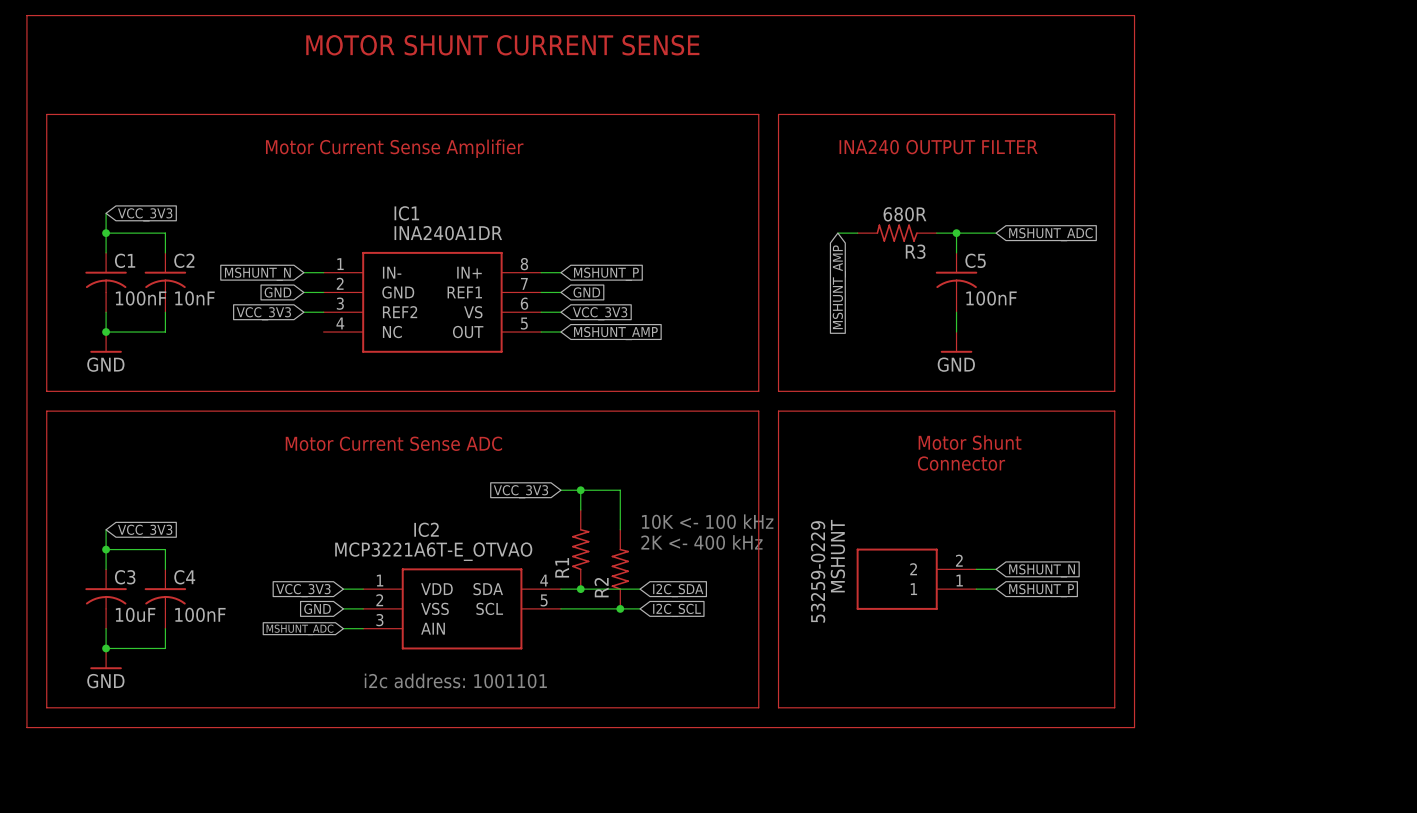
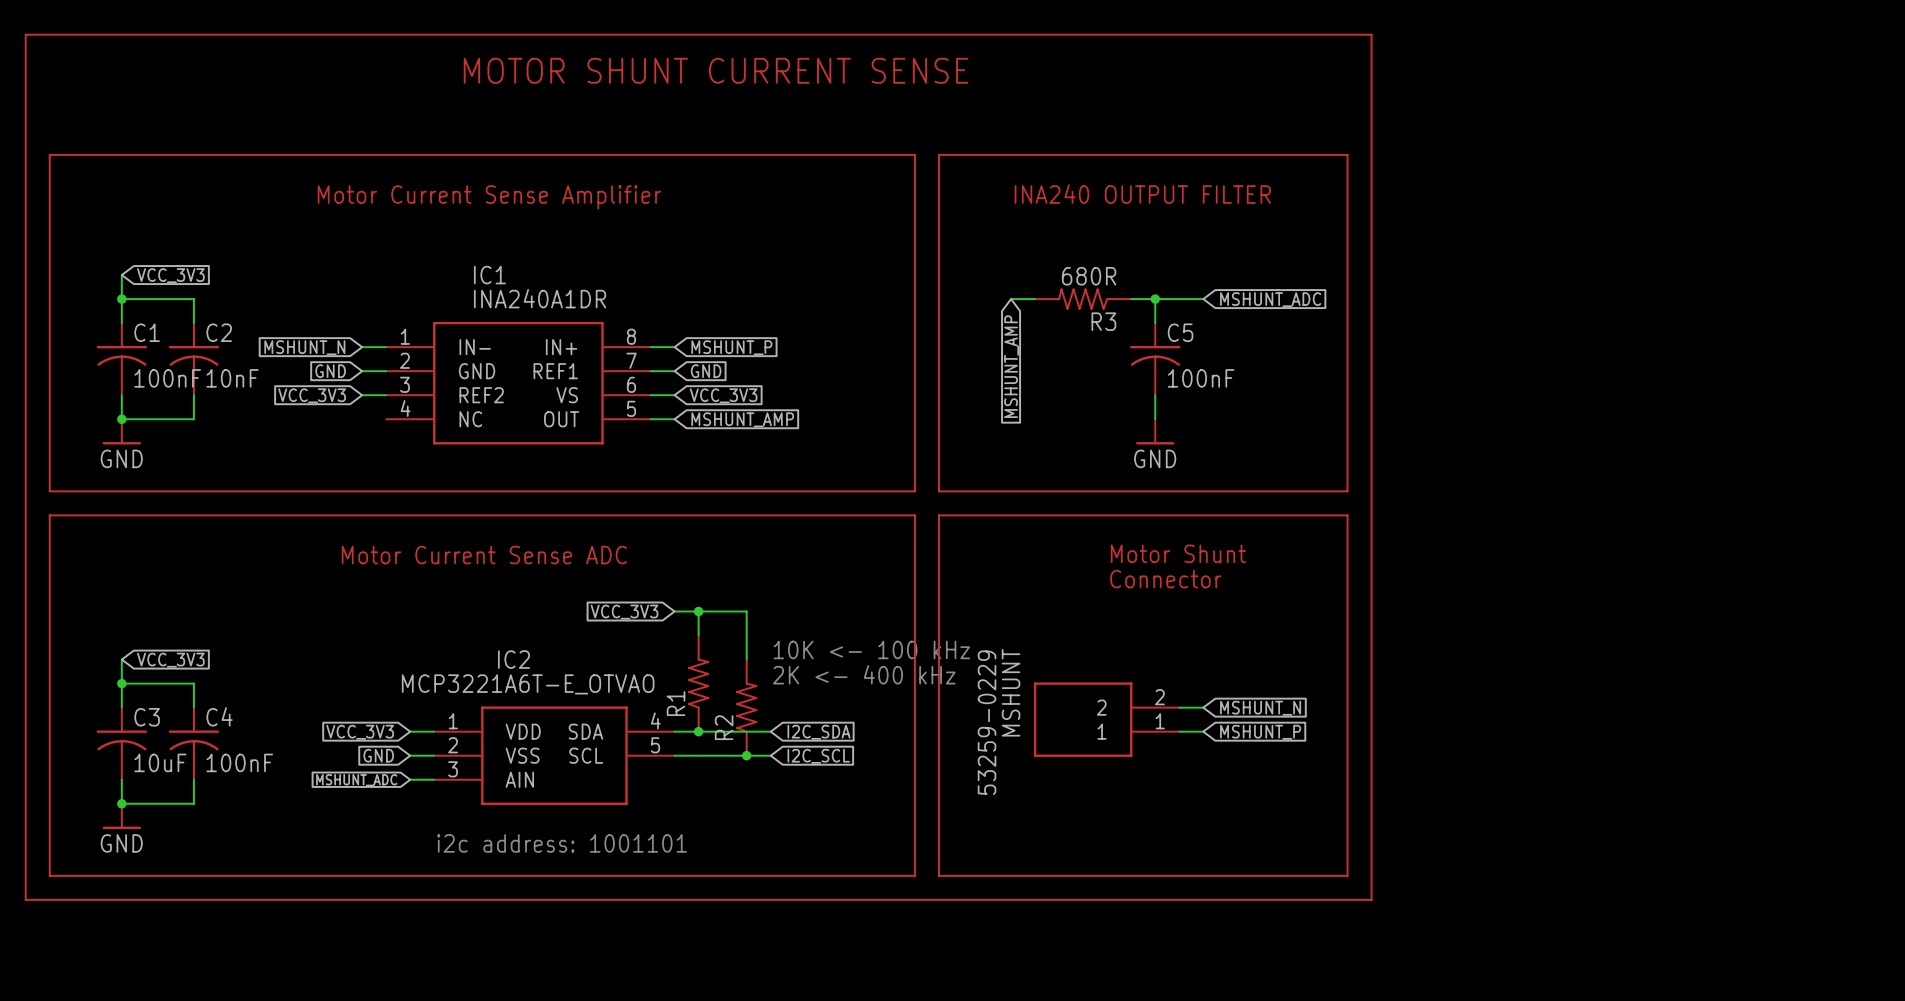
text position: MOTOR SHUNT CURRENT SENSE (502, 45) -> MOTOR SHUNT CURRENT SENSE (716, 70)

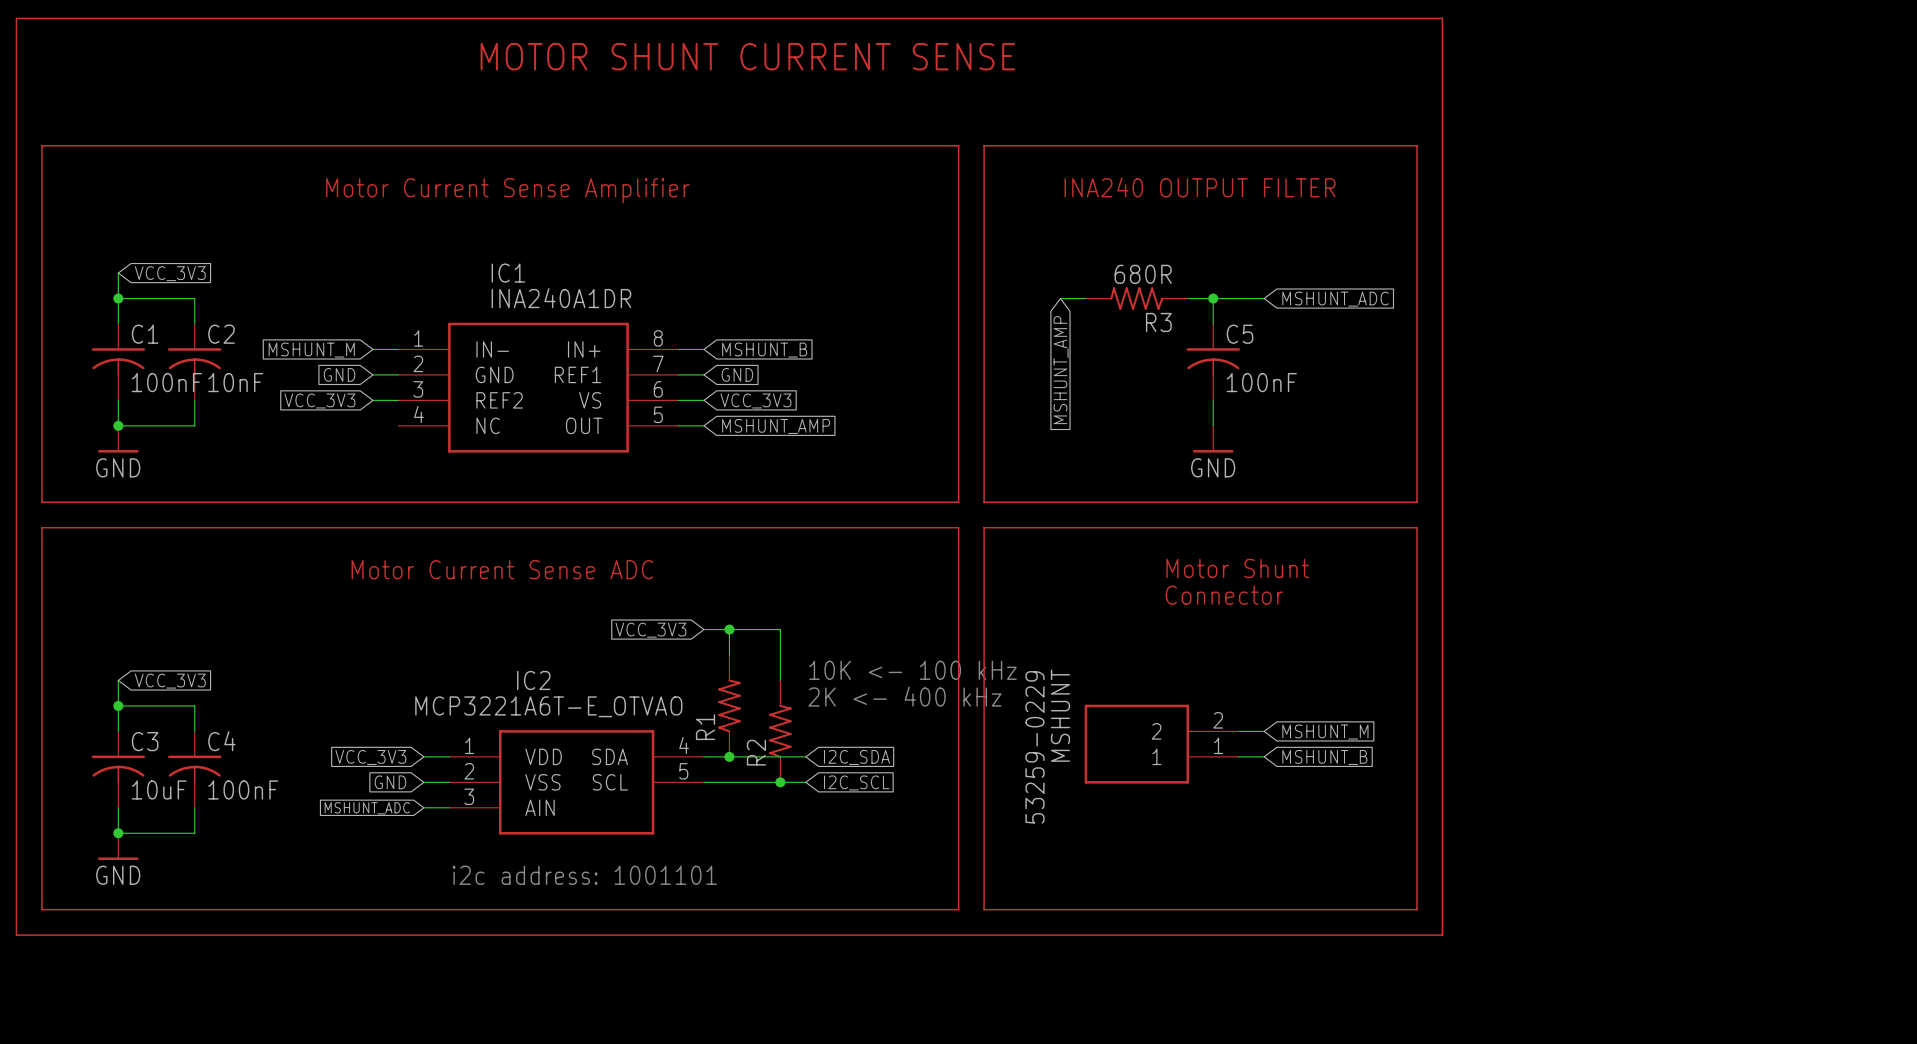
global label: MSHUNT_N (304, 347) -> MSHUNT_M (311, 350)
global label: MSHUNT_P (731, 347) -> MSHUNT_B (764, 350)
global label: MSHUNT_N (1260, 708) -> MSHUNT_M (1325, 732)
global label: MSHUNT_P (1260, 732) -> MSHUNT_B (1324, 757)

